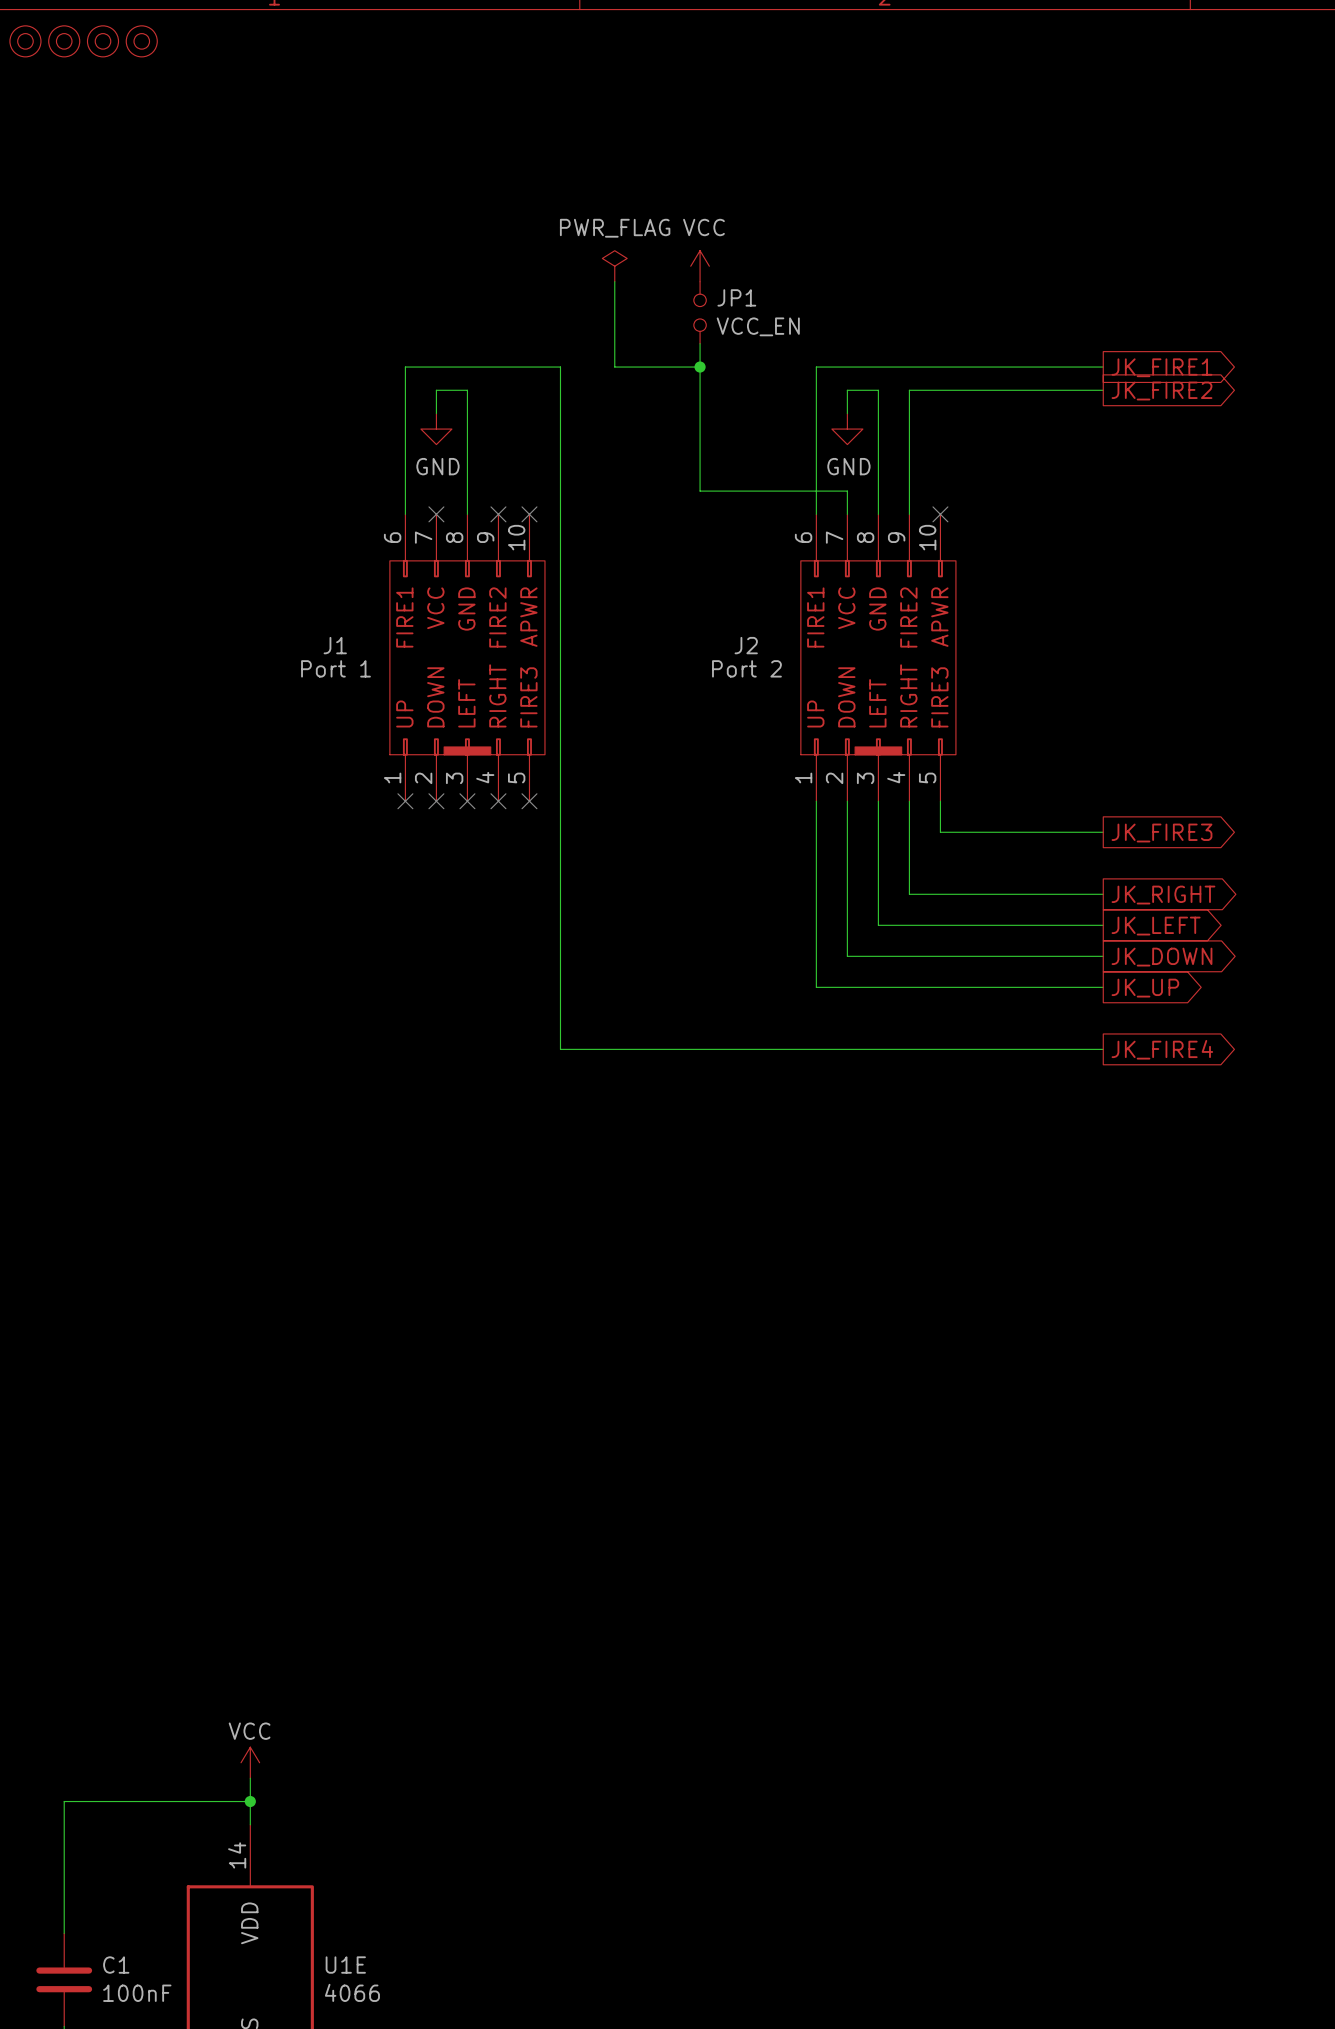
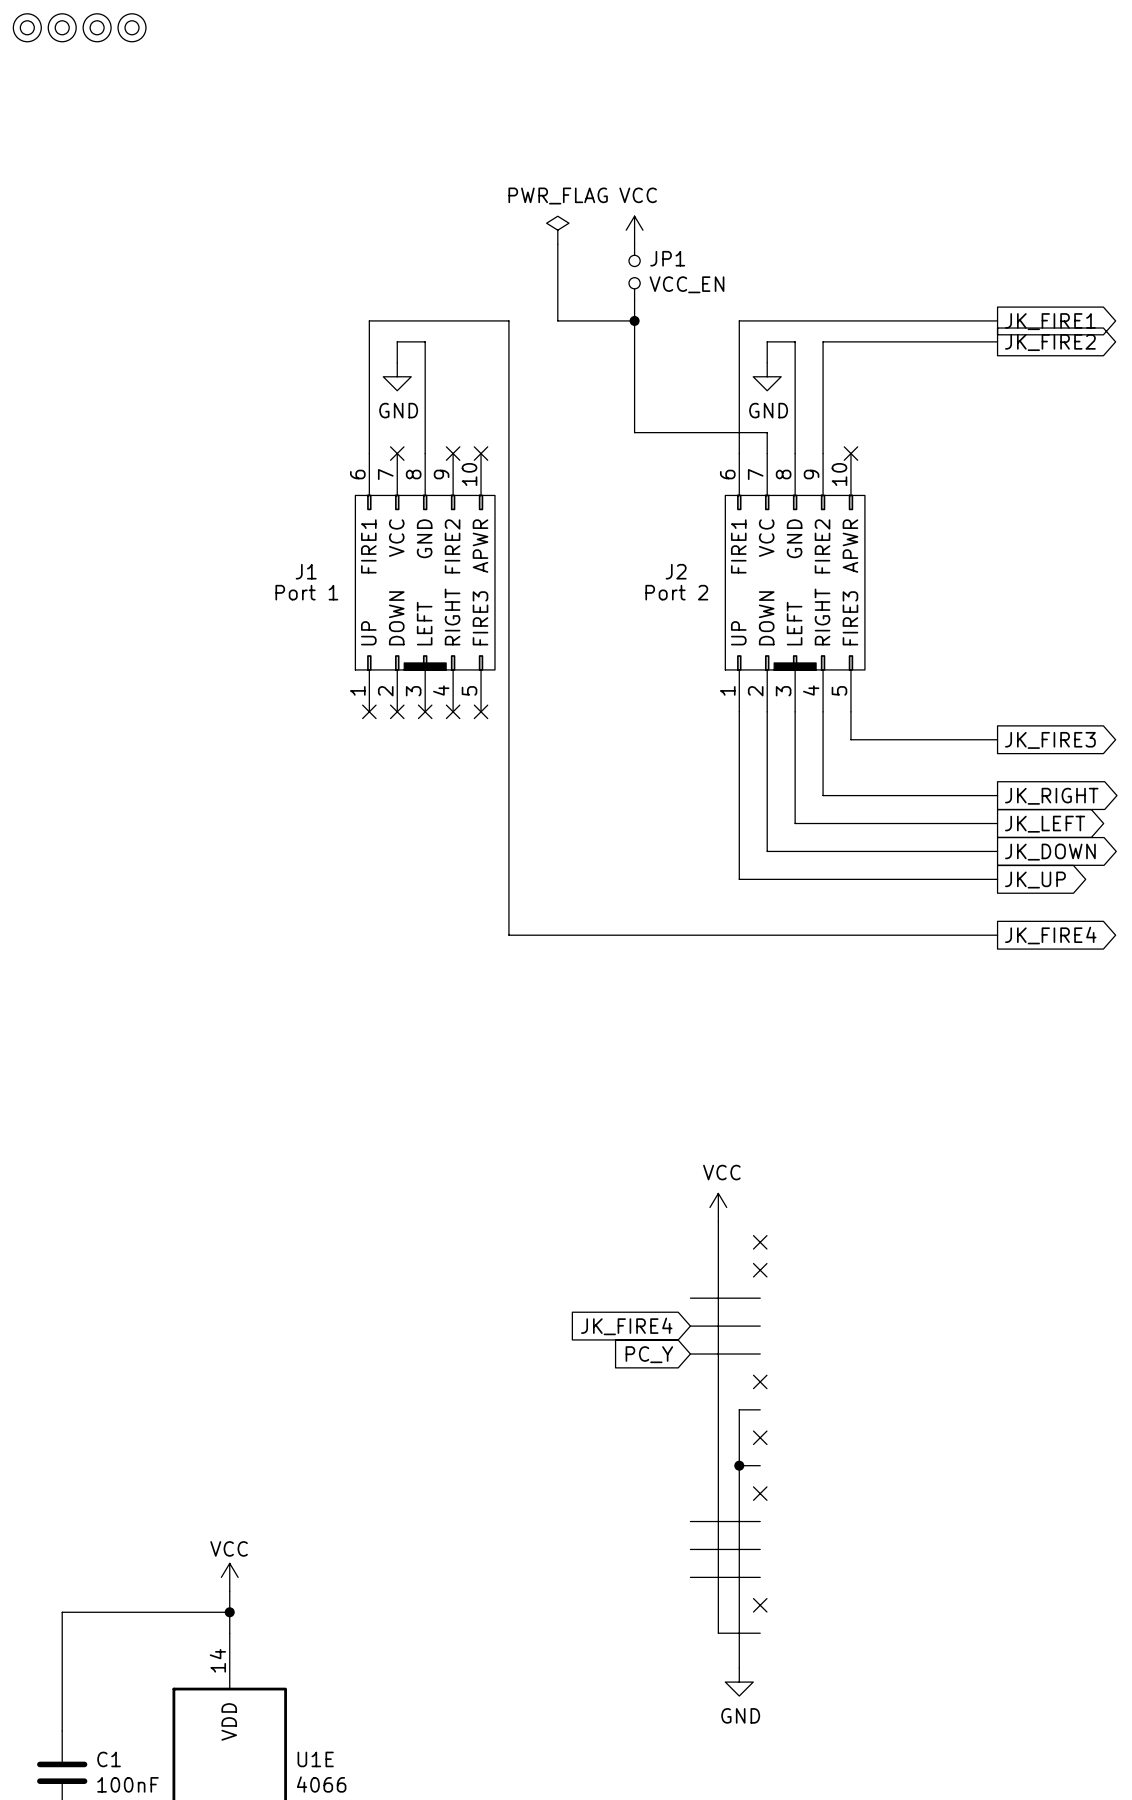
power symbol: none -> VCC (718, 1207)
wire: none -> (718, 1221) (718, 1633) (760, 1633)
no-connect mark: none -> (760, 1242)
no-connect mark: none -> (760, 1270)
wire: none -> (690, 1298) (760, 1298)
global label: none -> JK_FIRE4 (626, 1326)
wire: none -> (690, 1326) (760, 1326)
wire: none -> (690, 1354) (760, 1354)
global label: none -> PC_Y (649, 1354)
no-connect mark: none -> (760, 1381)
wire: none -> (760, 1409) (739, 1409) (739, 1668)
no-connect mark: none -> (760, 1437)
wire: none -> (739, 1465) (760, 1465)
junction: none -> (739, 1465)
no-connect mark: none -> (760, 1493)
wire: none -> (690, 1521) (760, 1521)
wire: none -> (690, 1549) (760, 1549)
wire: none -> (690, 1577) (760, 1577)
no-connect mark: none -> (760, 1605)
power symbol: none -> GND (739, 1682)

